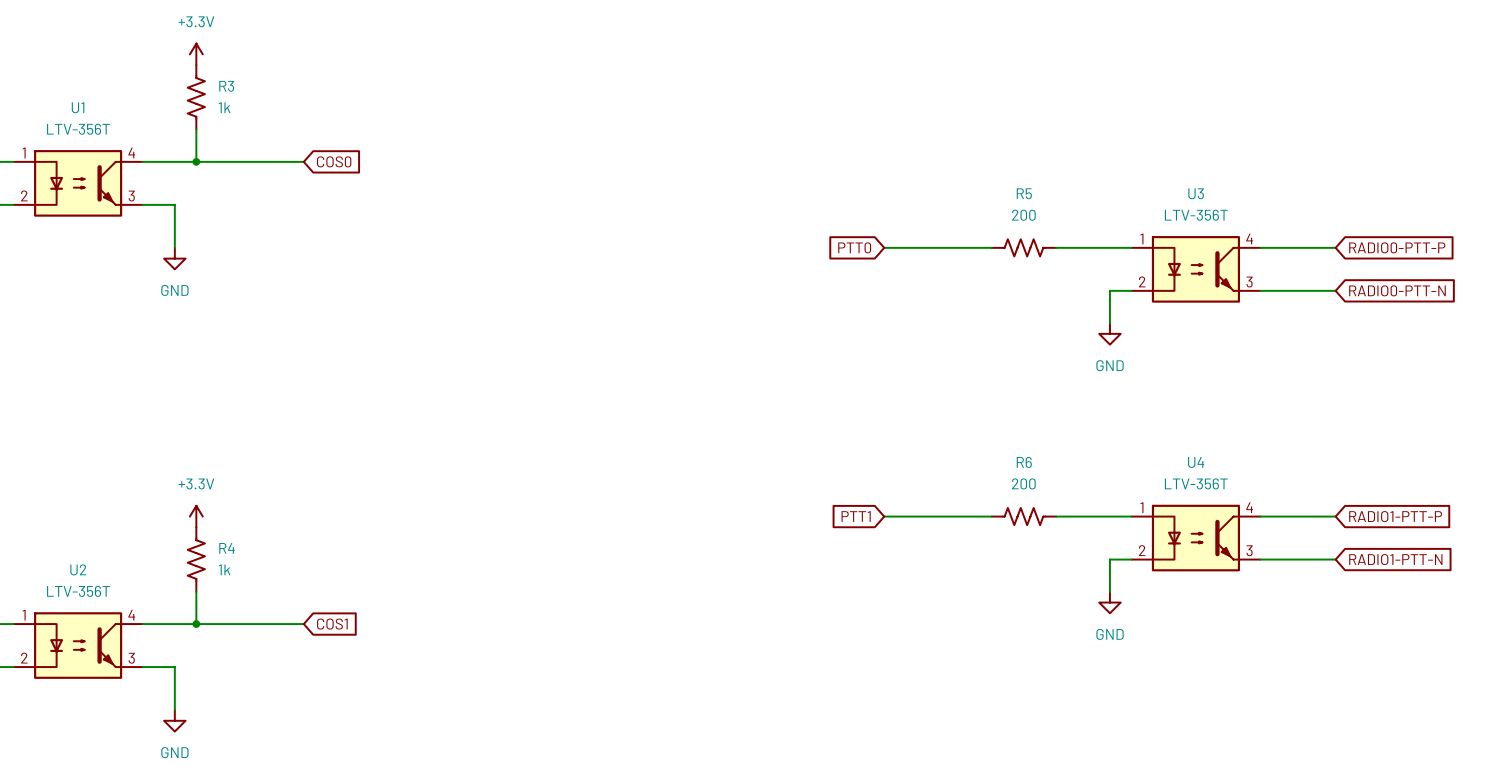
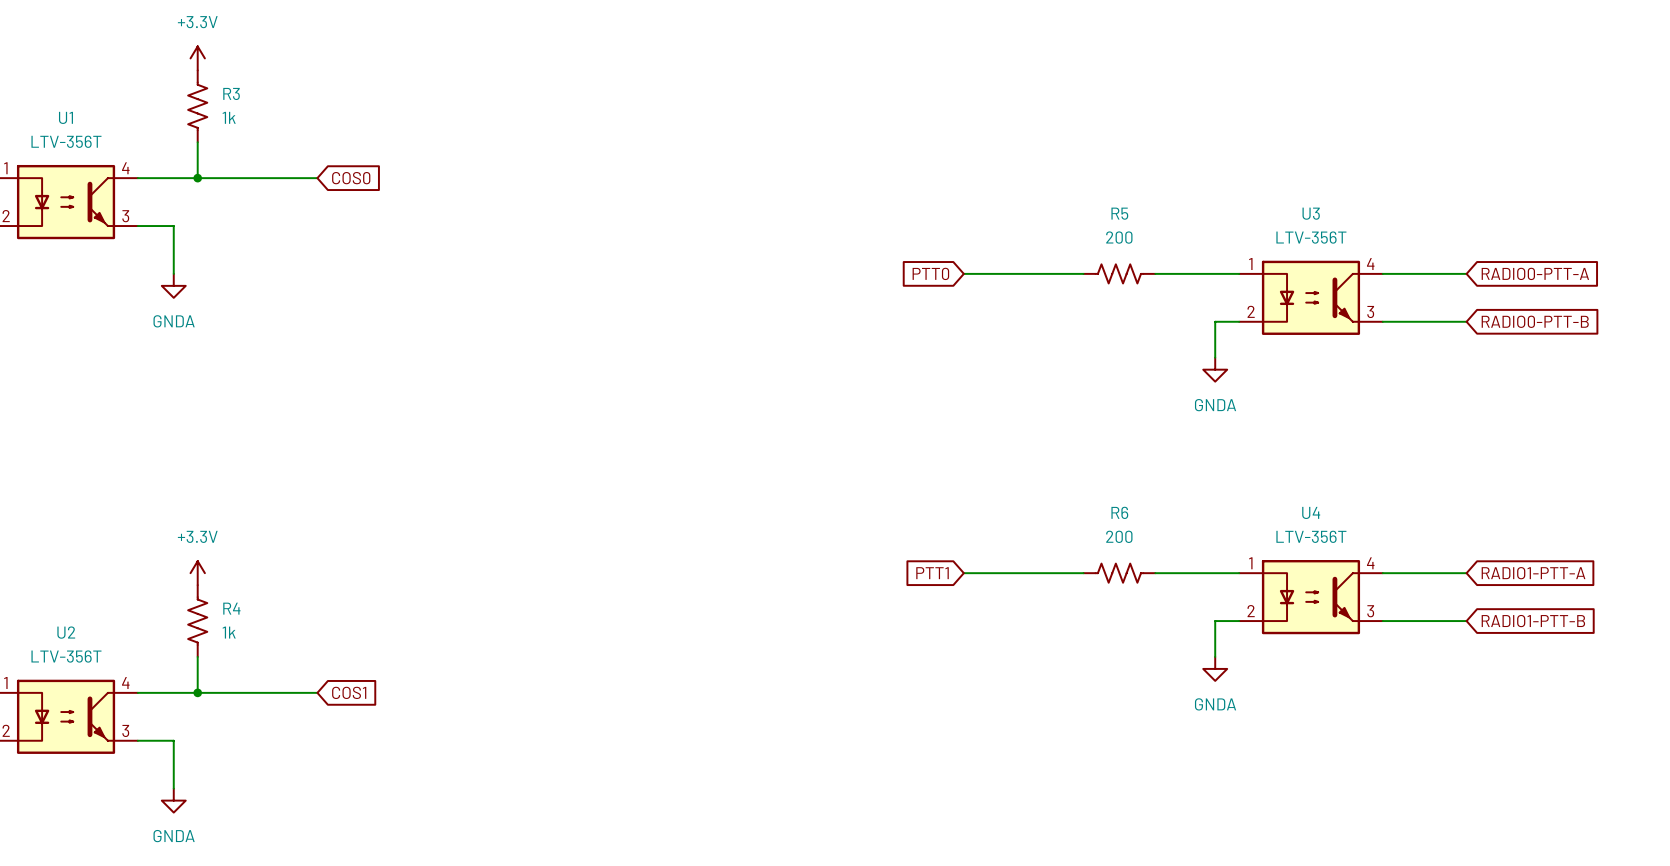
global label: RADIO0-PTT-P (1397, 247) -> RADIO0-PTT-A (1535, 273)
power symbol: GND (174, 258) -> GNDA (173, 285)
global label: RADIO0-PTT-N (1397, 290) -> RADIO0-PTT-B (1535, 321)
power symbol: GND (1109, 333) -> GNDA (1215, 369)
global label: RADIO1-PTT-P (1395, 516) -> RADIO1-PTT-A (1533, 573)
global label: RADIO1-PTT-N (1395, 559) -> RADIO1-PTT-B (1533, 621)
power symbol: GND (1109, 602) -> GNDA (1215, 668)
power symbol: GND (174, 720) -> GNDA (173, 800)

